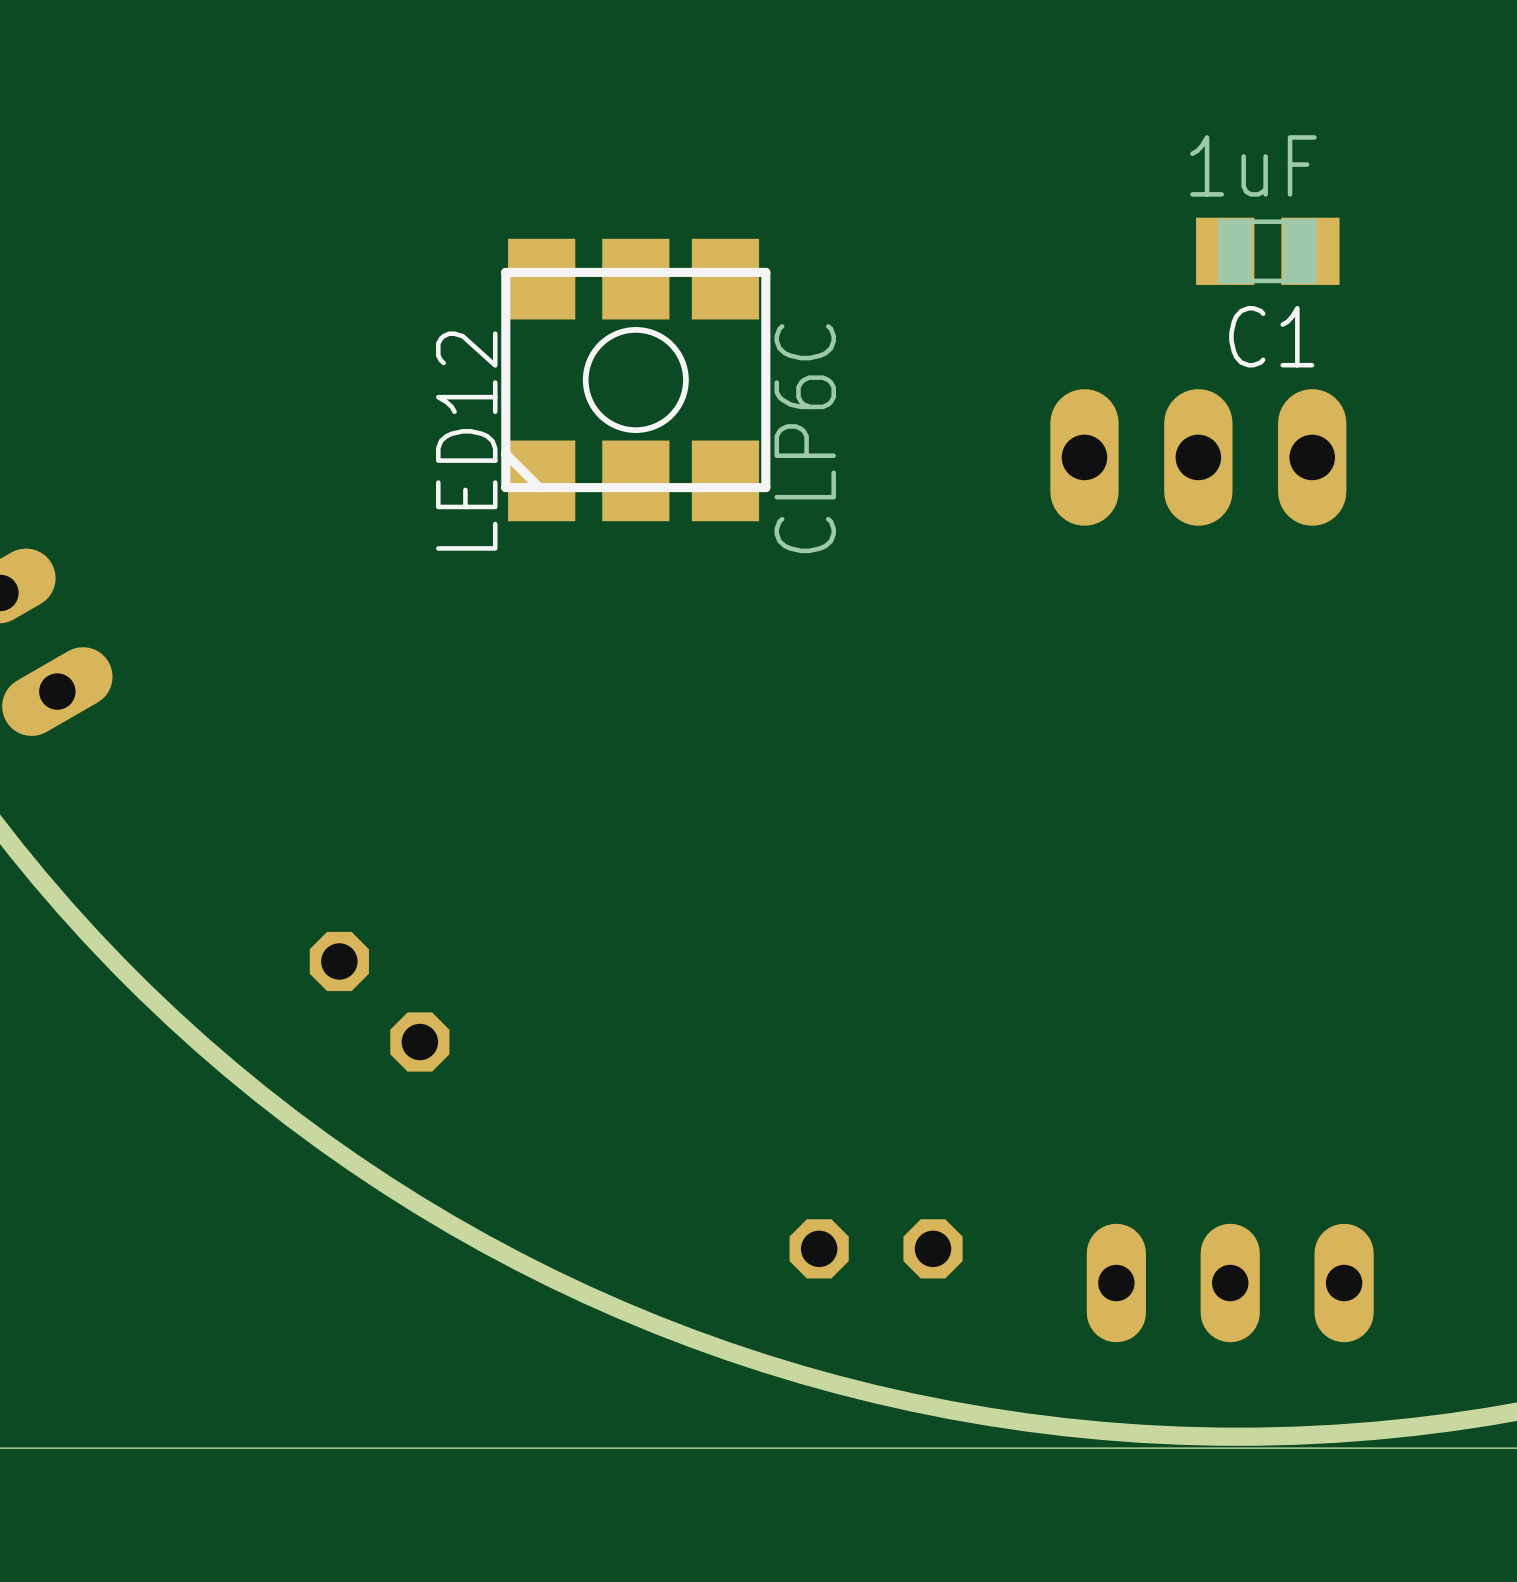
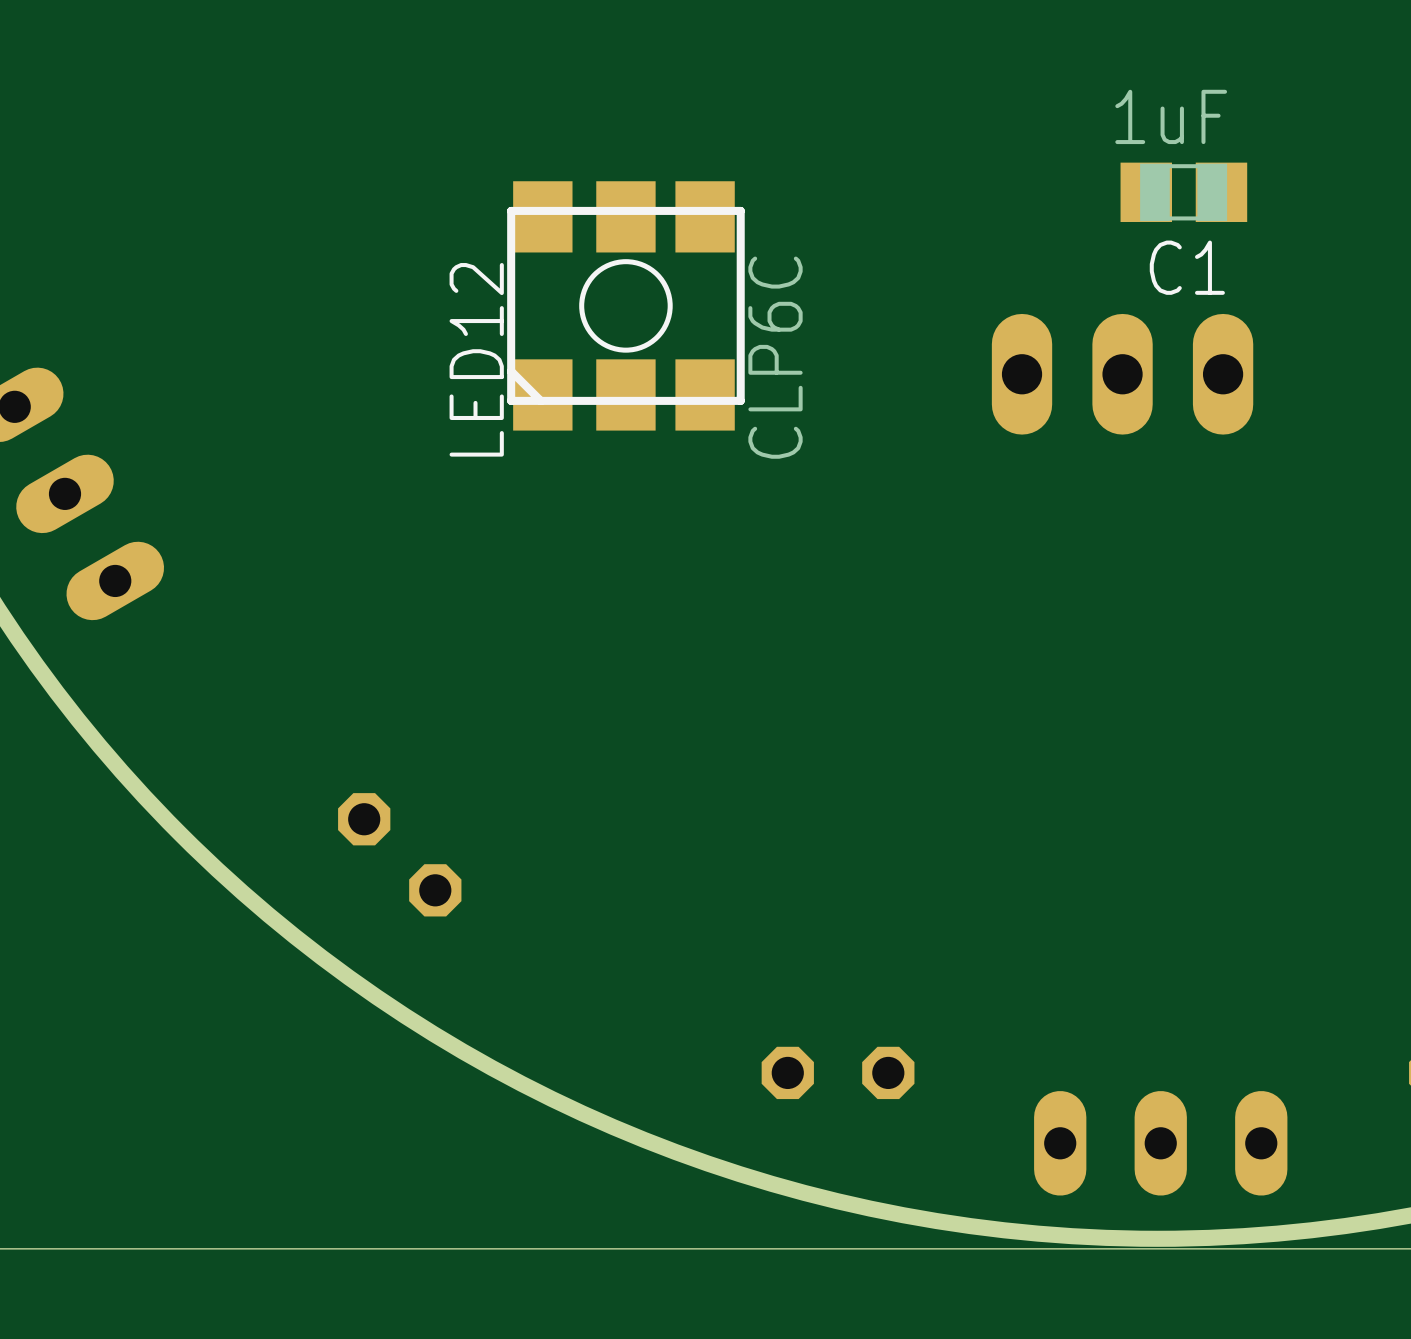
part position: (1230, 1283) -> (1160, 1143)

